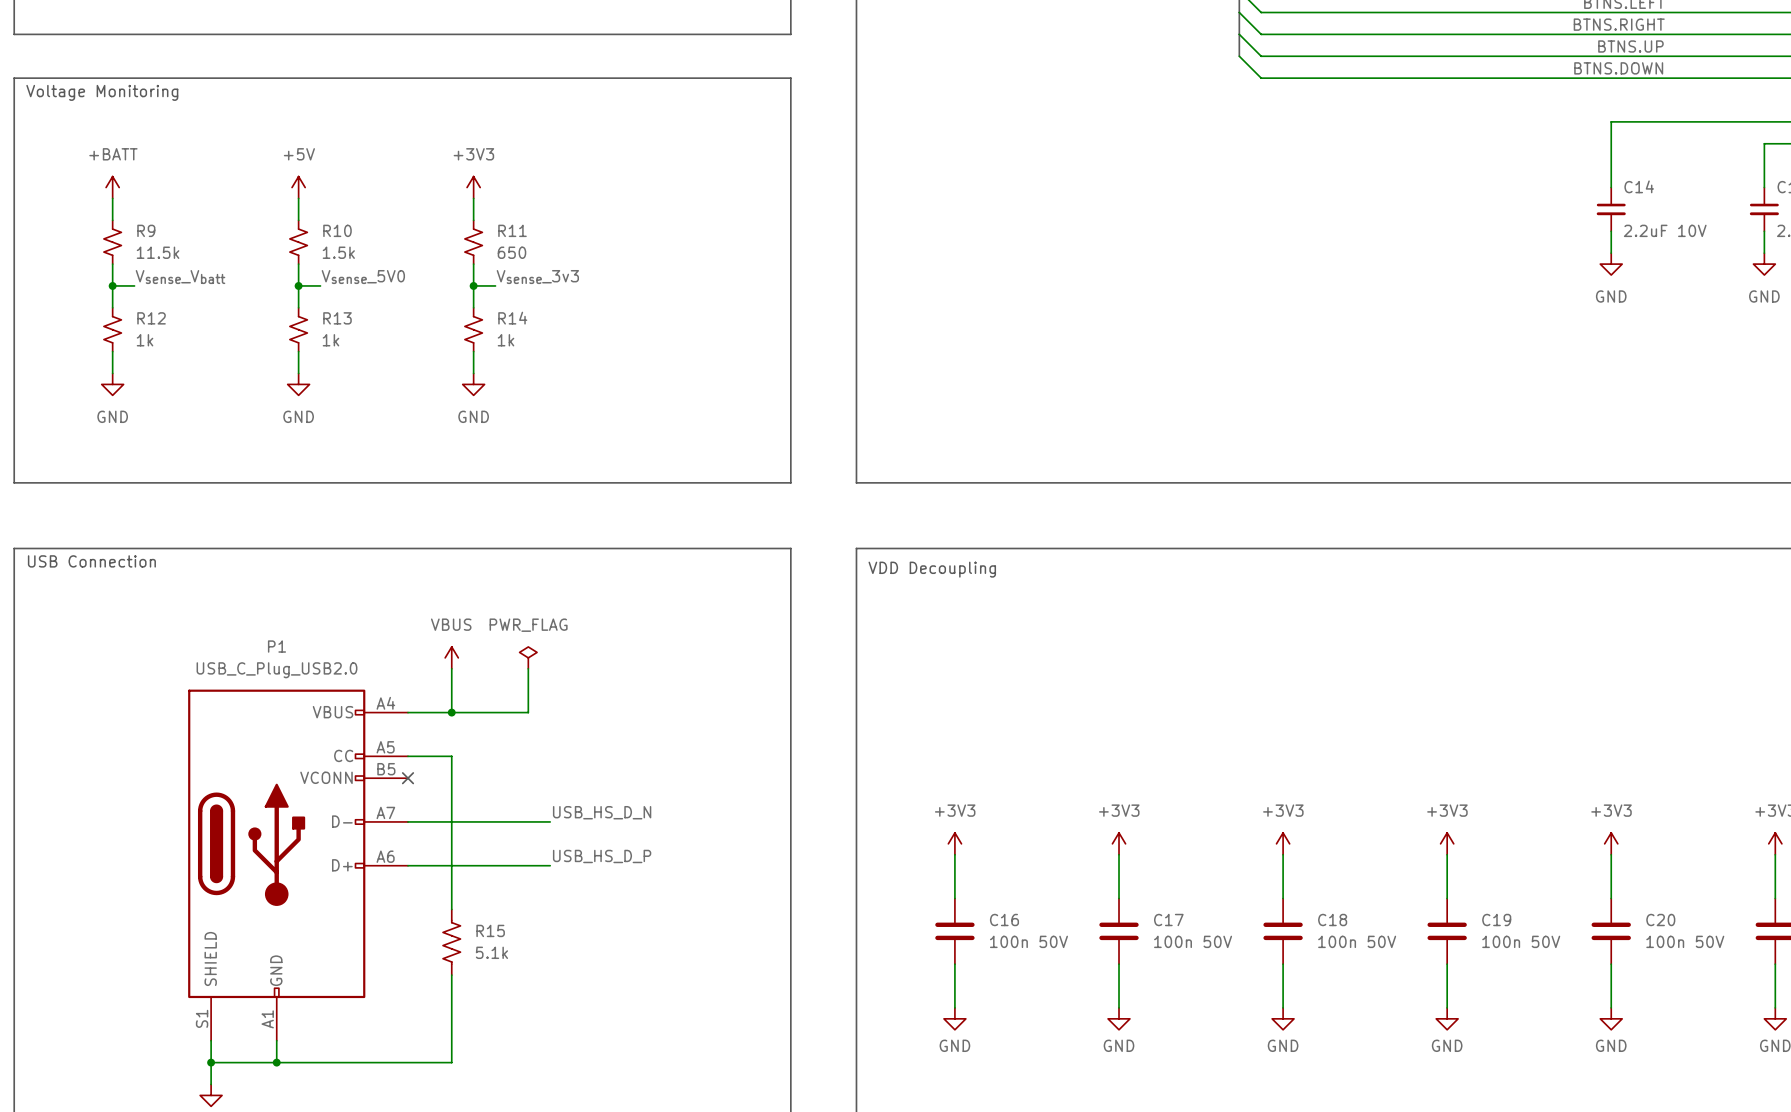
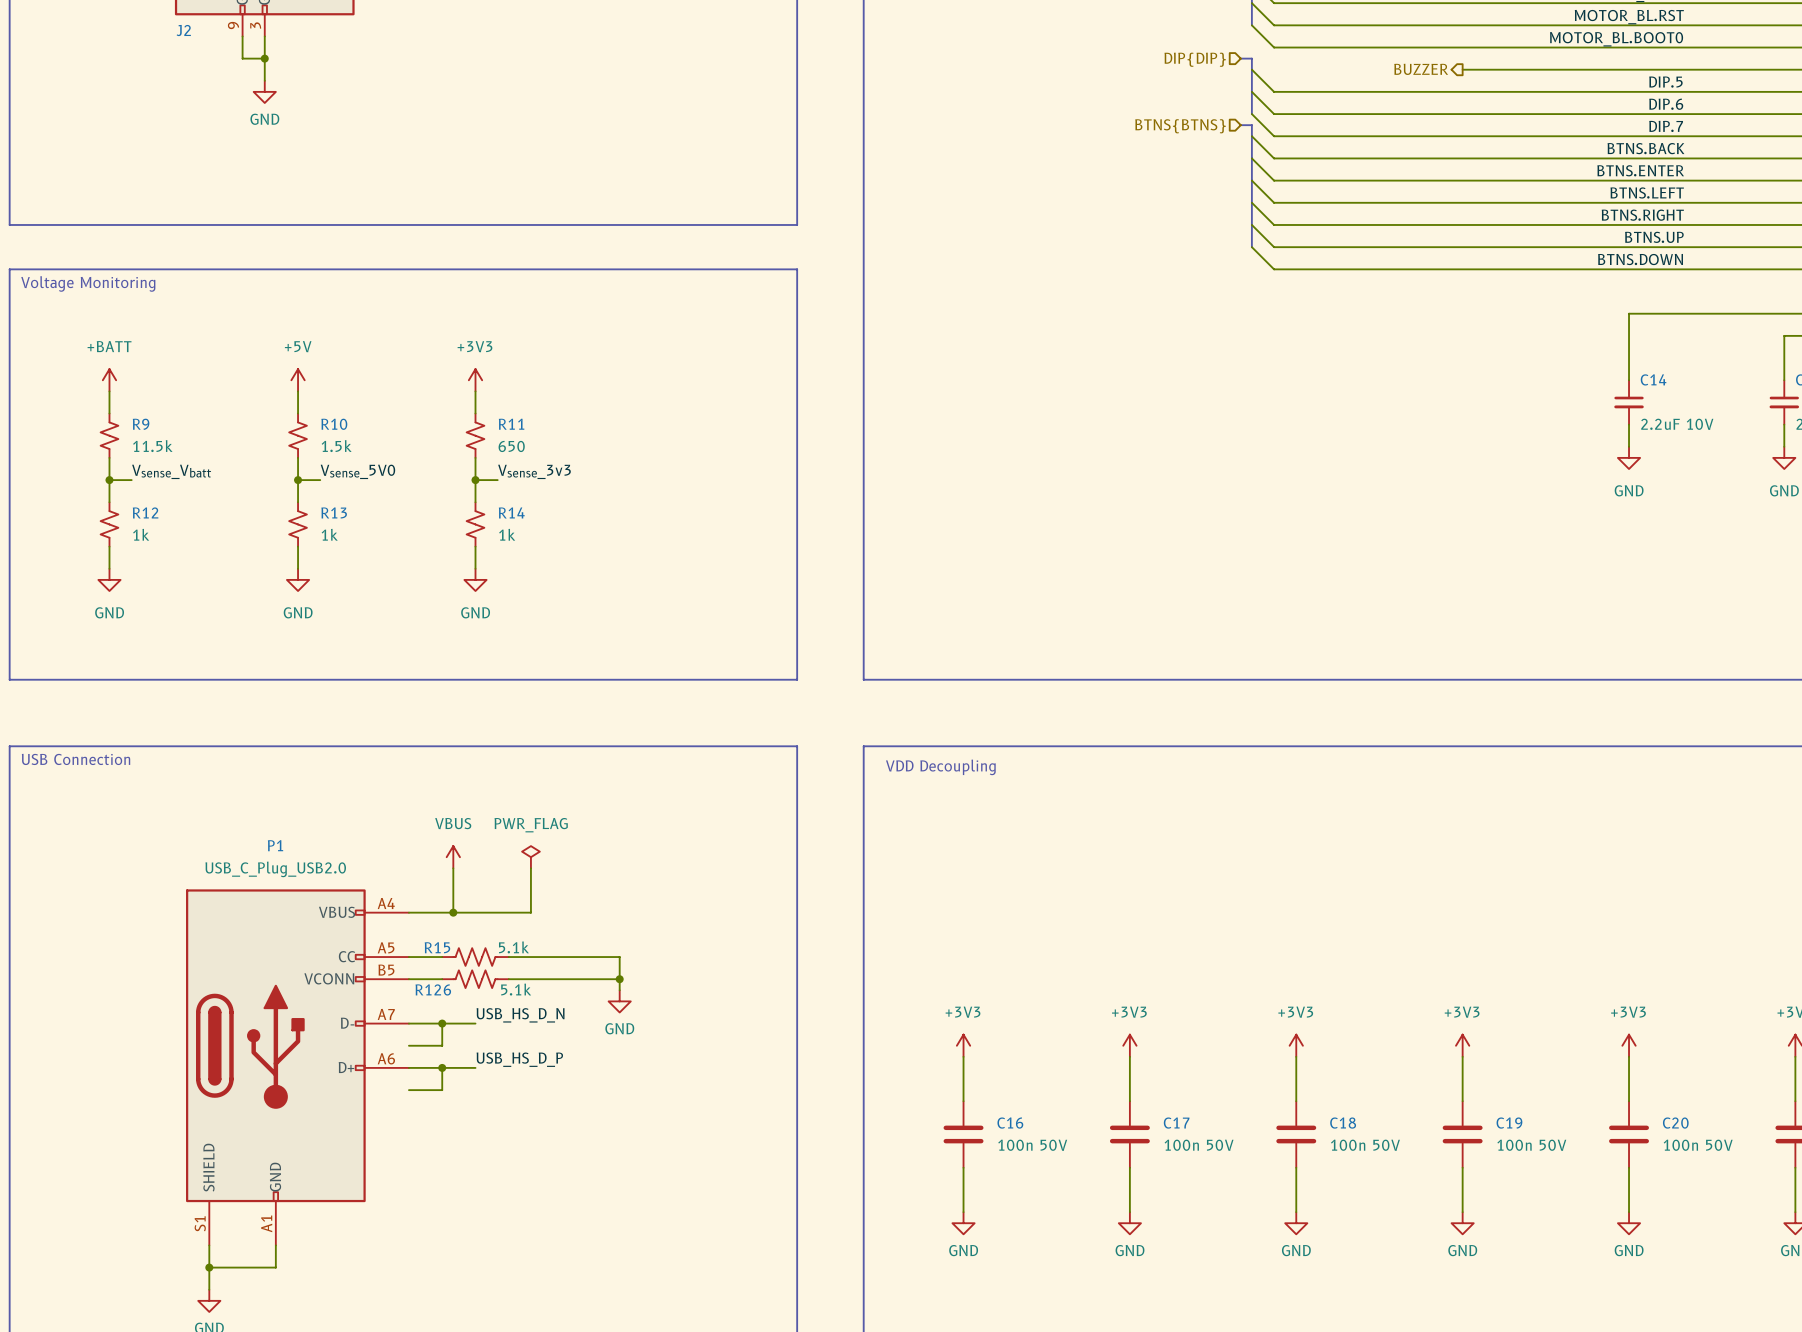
wire: (440, 756) (451, 756) (451, 909) -> none
wire: none -> (508, 957) (619, 957) (619, 990)
wire: none -> (408, 979) (442, 979)
no-connect mark: (407, 778) -> none
R126: none -> 5.1k (475, 979)
wire: none -> (508, 979) (619, 979)
junction: none -> (619, 979)
power symbol: none -> GND (619, 1001)
label position: USB_HS_D_N (602, 812) -> USB_HS_D_N (520, 1015)
wire: none -> (442, 1023) (442, 1045) (408, 1045)
junction: none -> (442, 1023)
wire: (473, 821) (550, 821) -> none
label position: USB_HS_D_P (602, 856) -> USB_HS_D_P (519, 1059)
wire: none -> (442, 1067) (442, 1090) (408, 1090)
junction: none -> (442, 1067)
wire: (473, 865) (550, 865) -> none
R15 name position: R15 (490, 930) -> R15 (437, 947)
R15 rotation: 0° (451, 942) -> 90° clockwise (475, 957)
R15 position: (451, 942) -> (475, 957)
R15 value position: 5.1k (491, 952) -> 5.1k (513, 947)
wire: (451, 975) (451, 1062) (276, 1062) -> none
junction: (276, 1062) -> none

